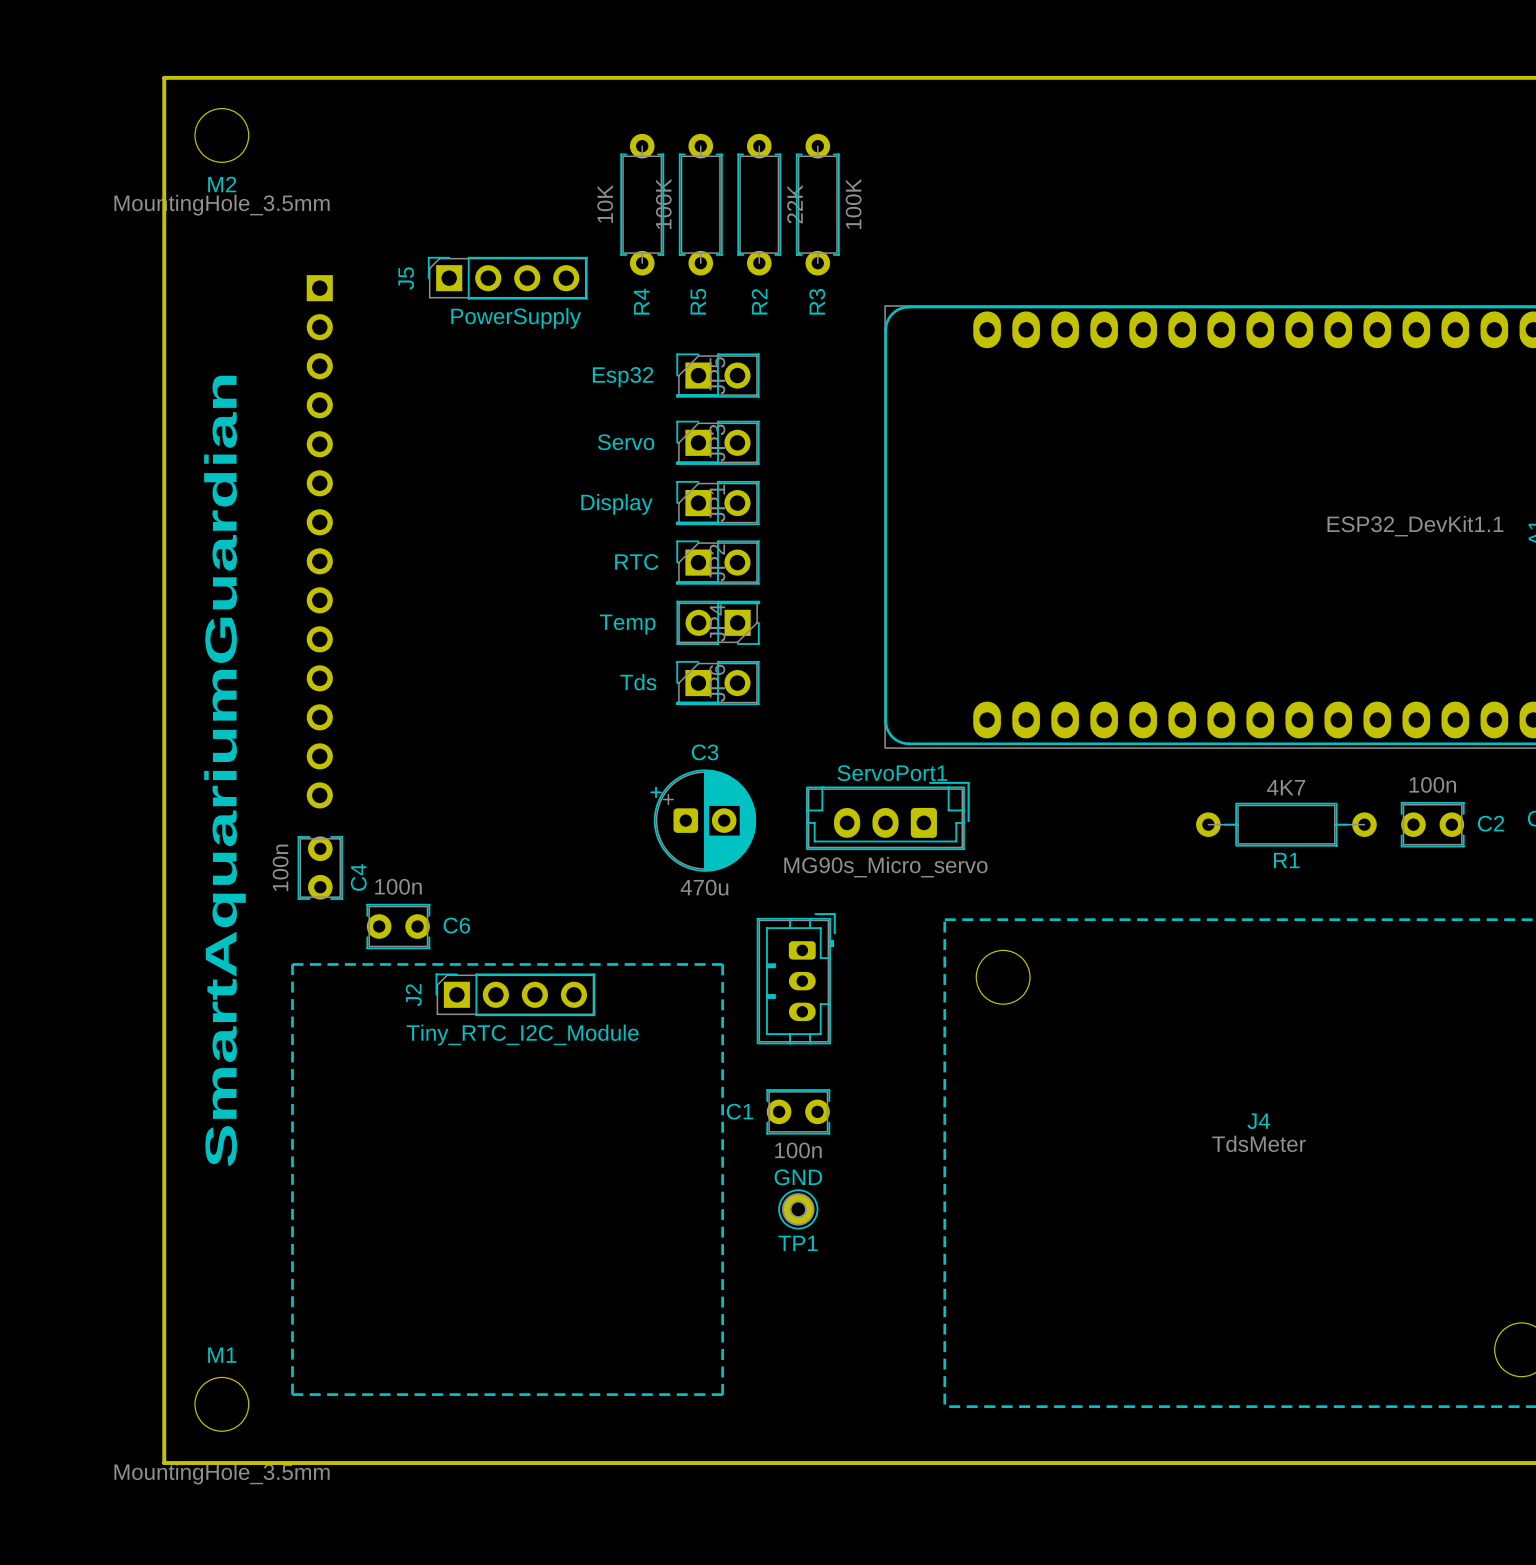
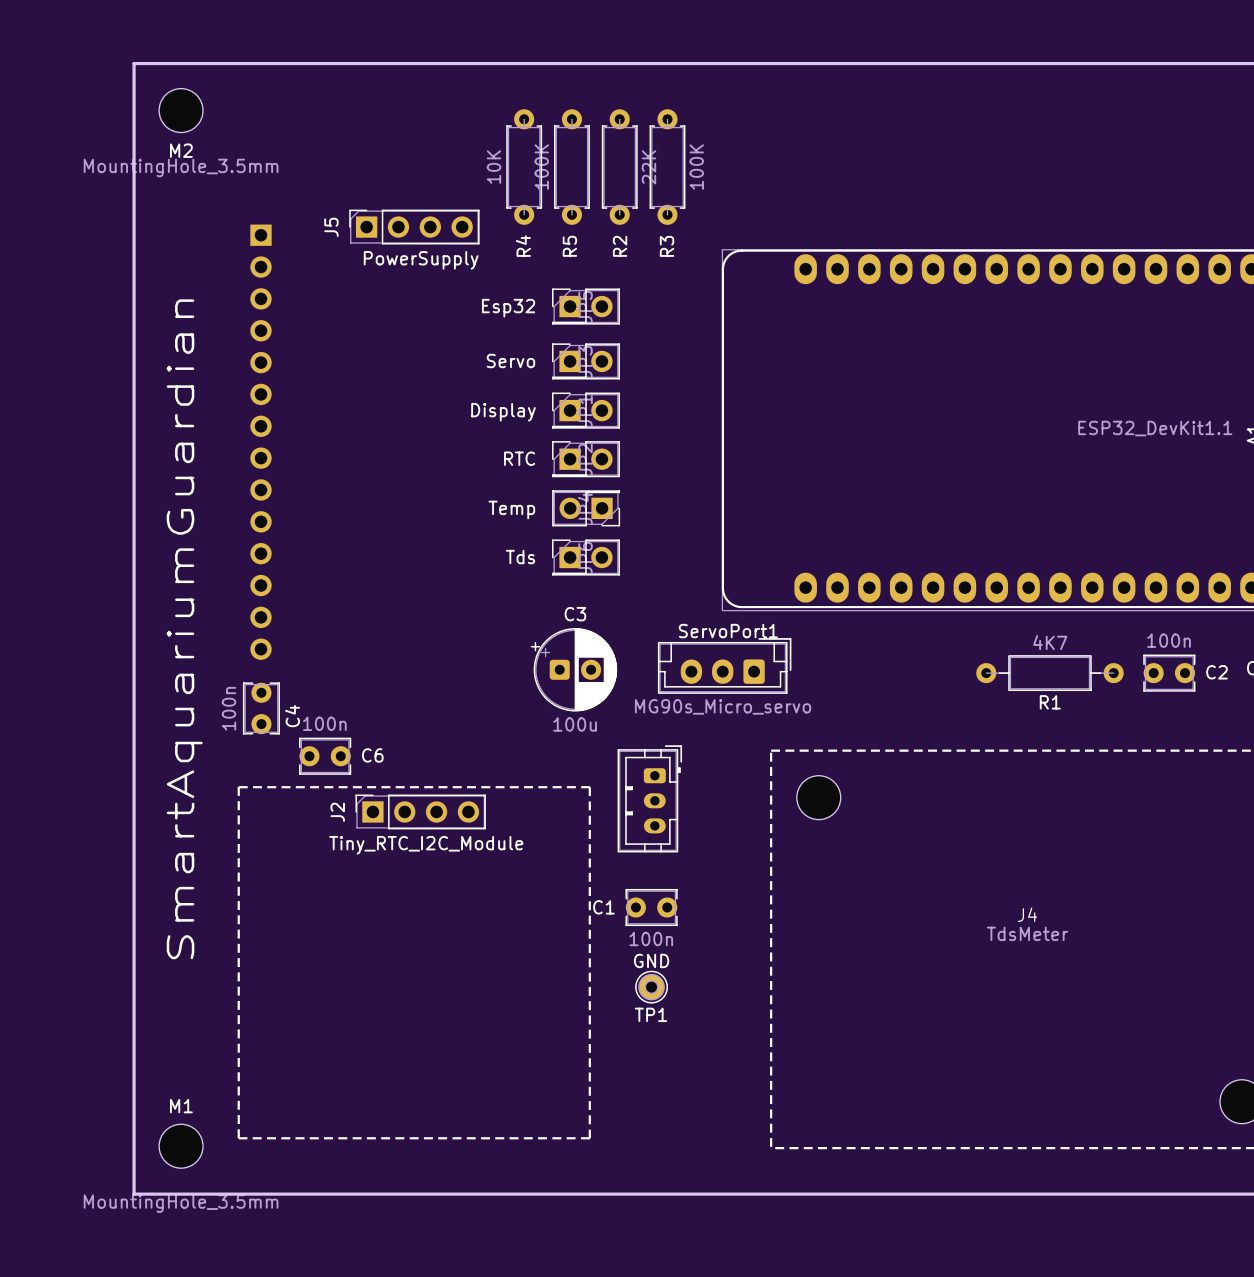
C3 value: 470u (704, 887) -> 100u (575, 724)

